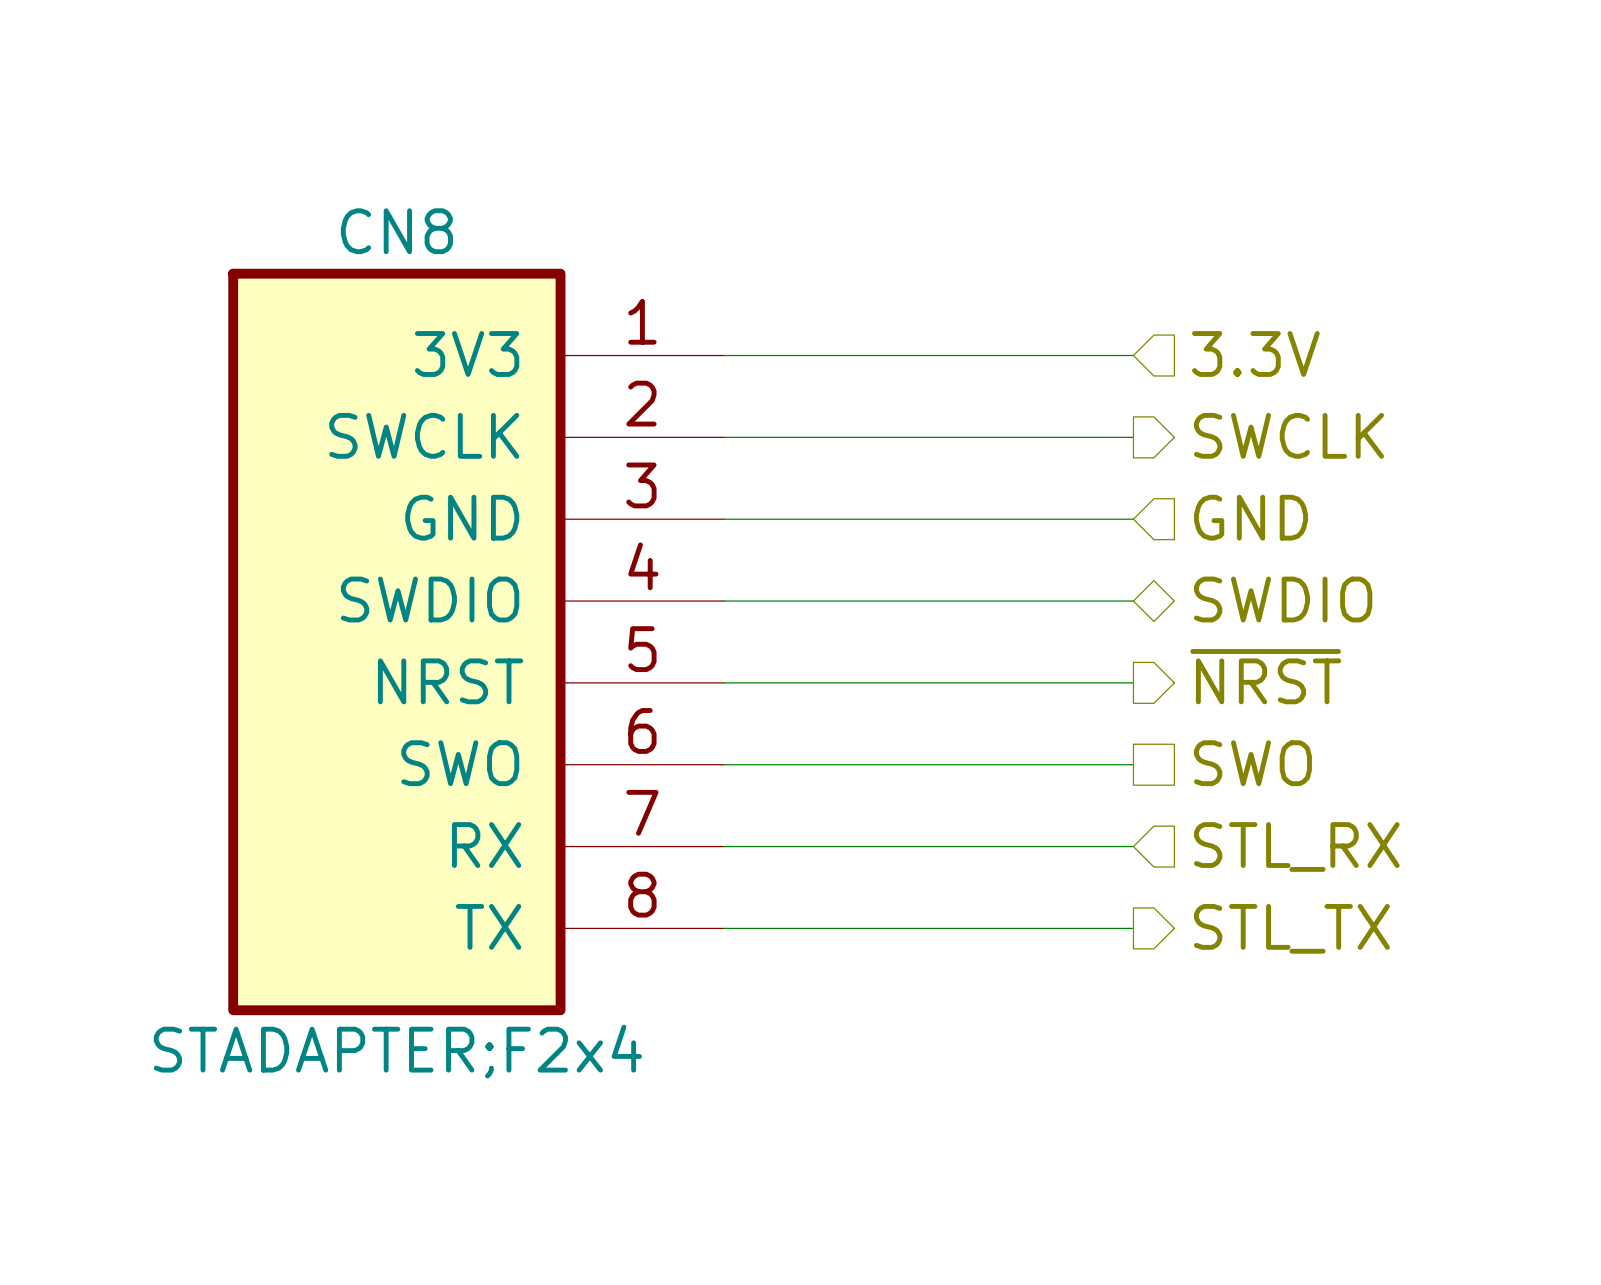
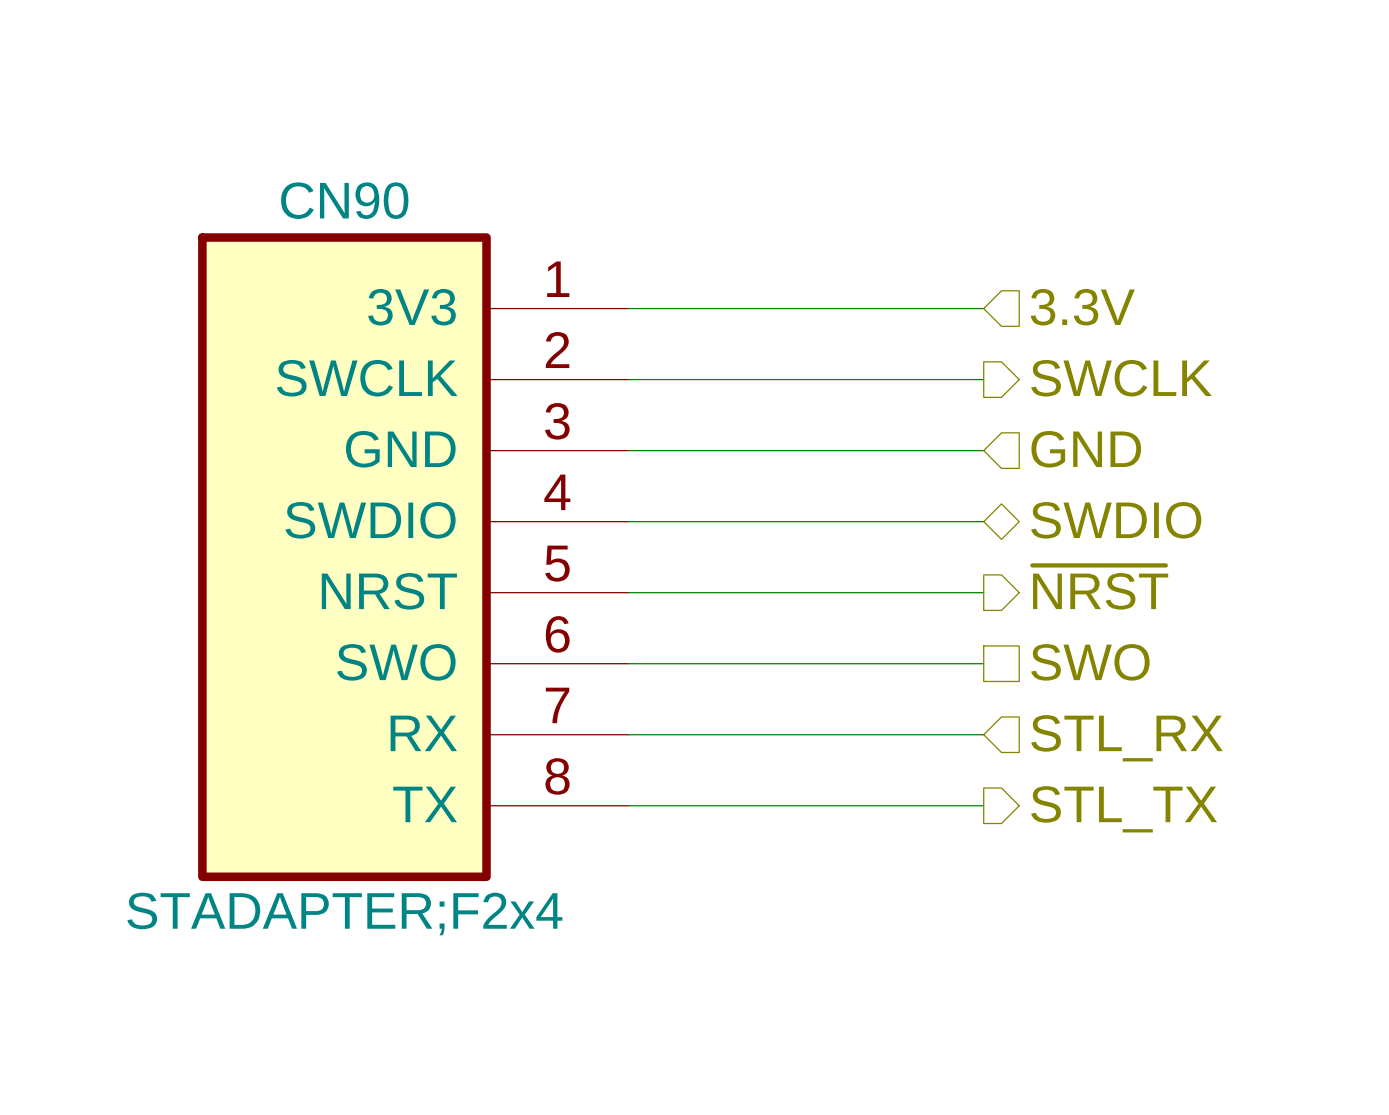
CN8 name: CN8 (396, 231) -> CN90 (344, 200)

